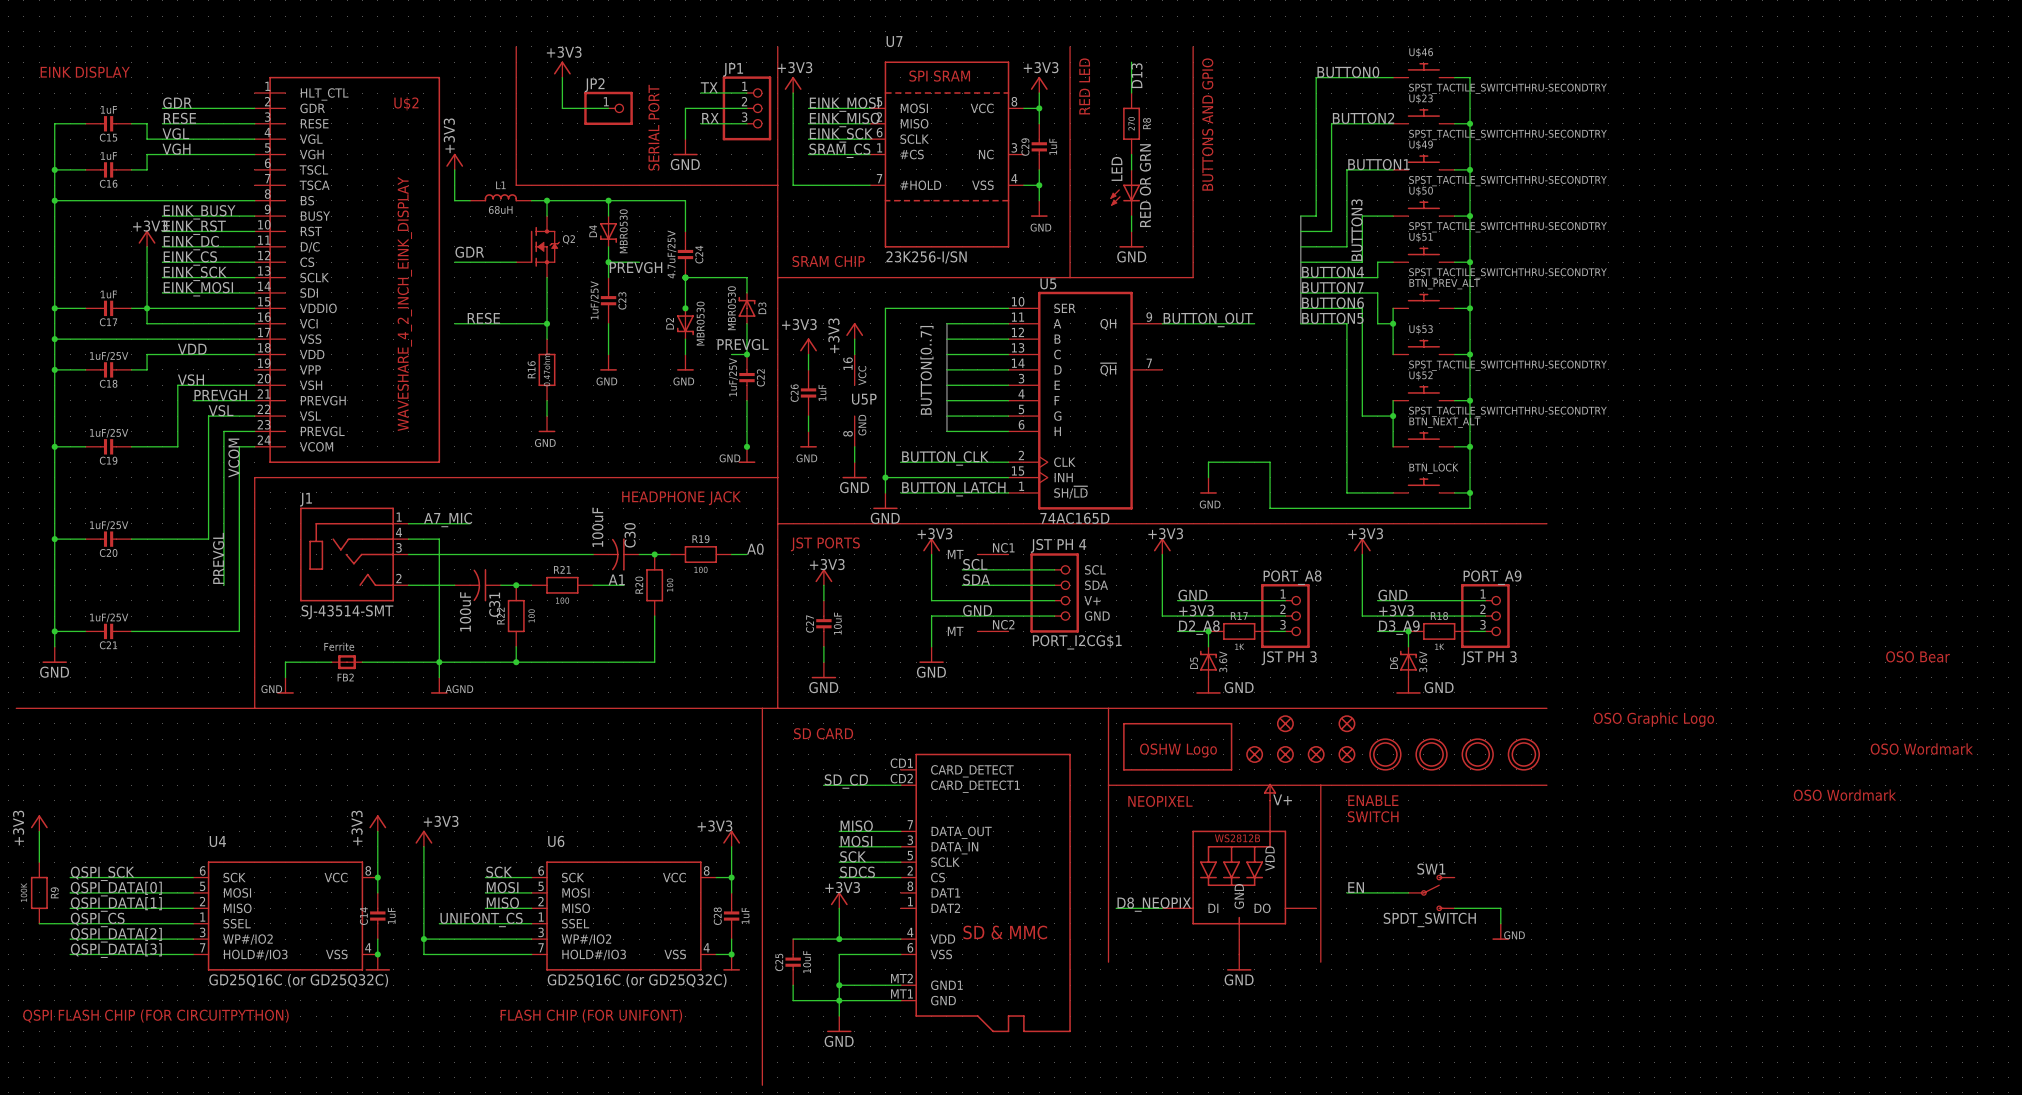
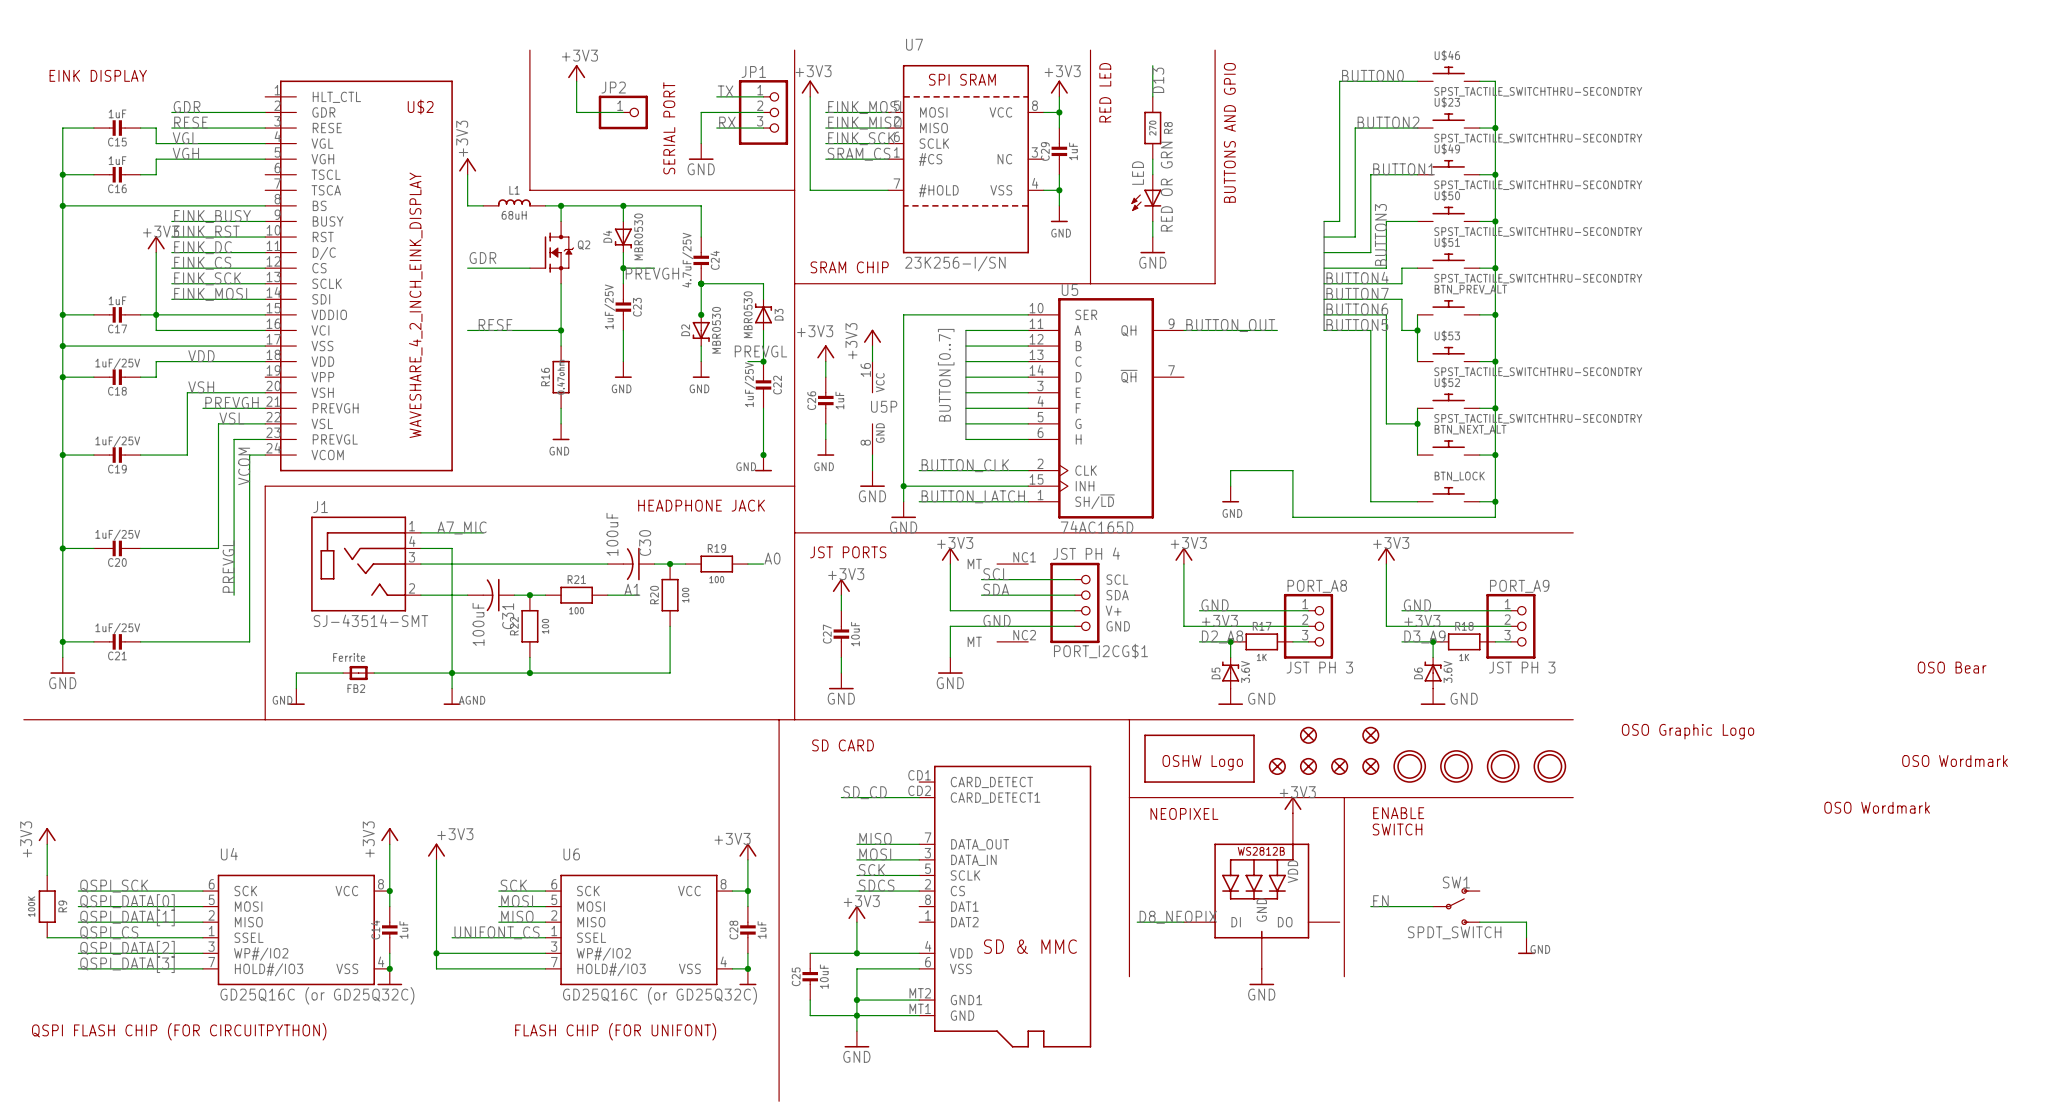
power symbol: V+ (1270, 792) -> +3V3 (1292, 805)

